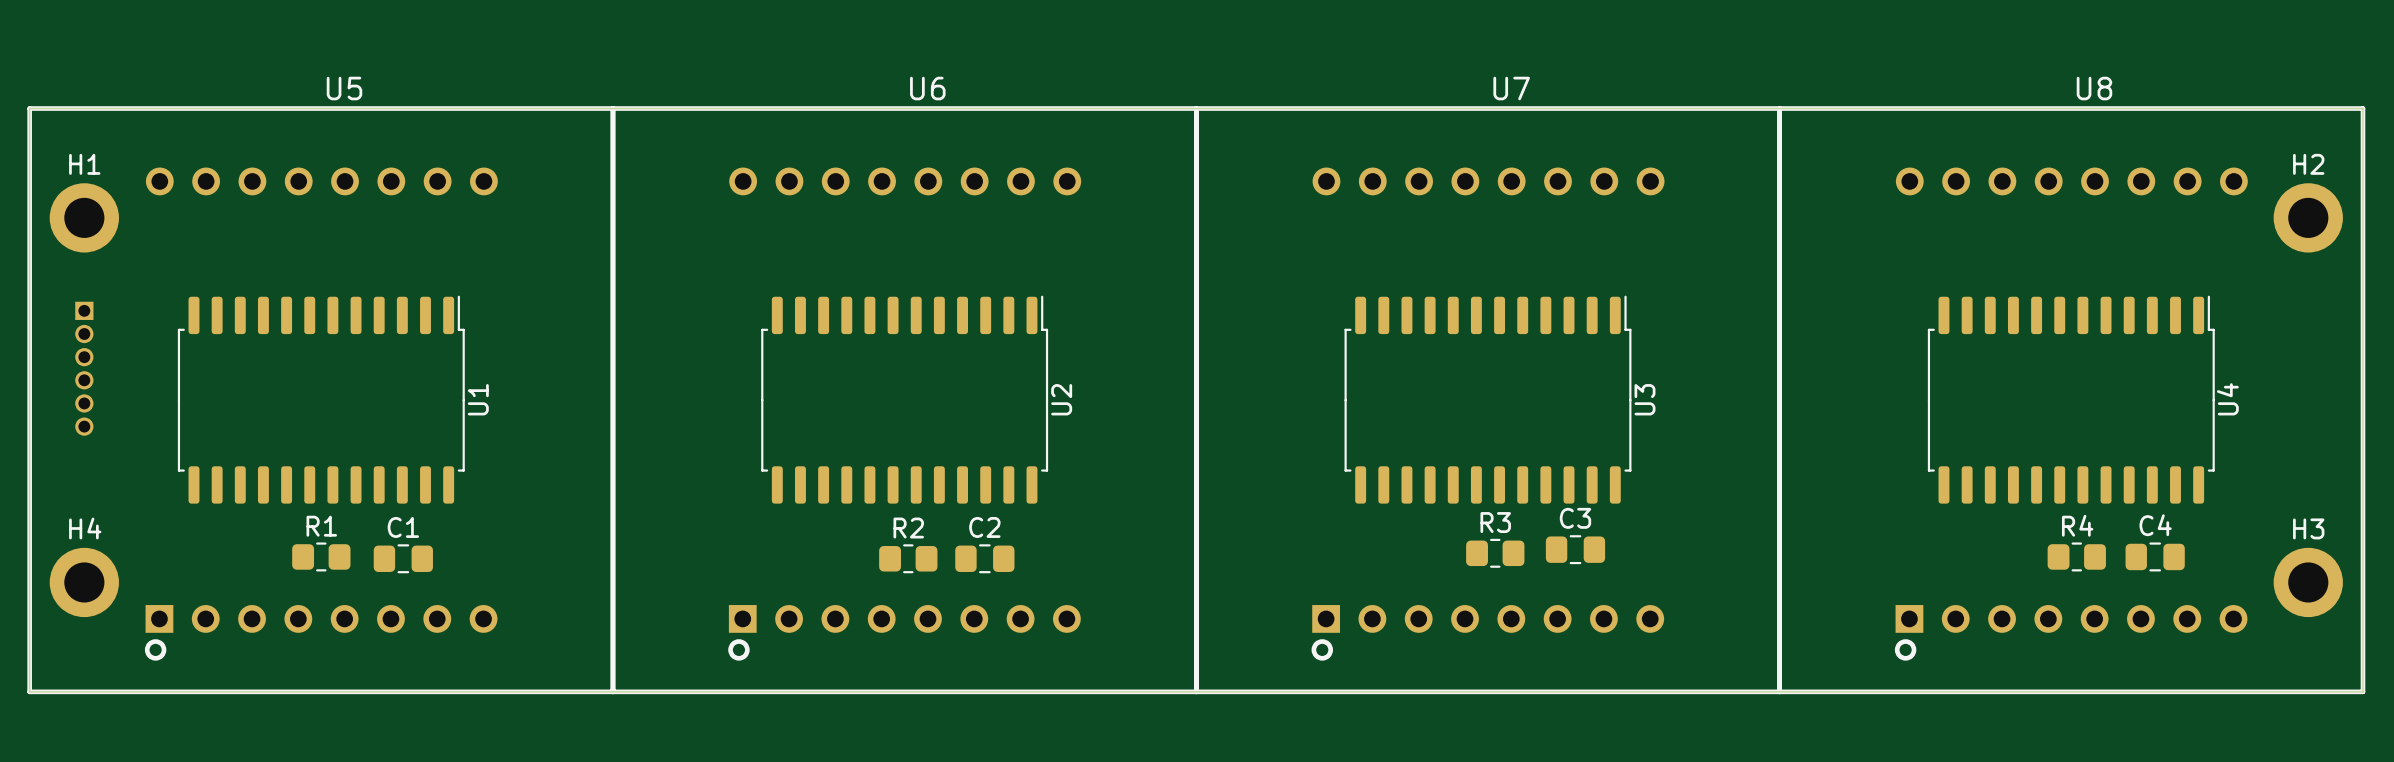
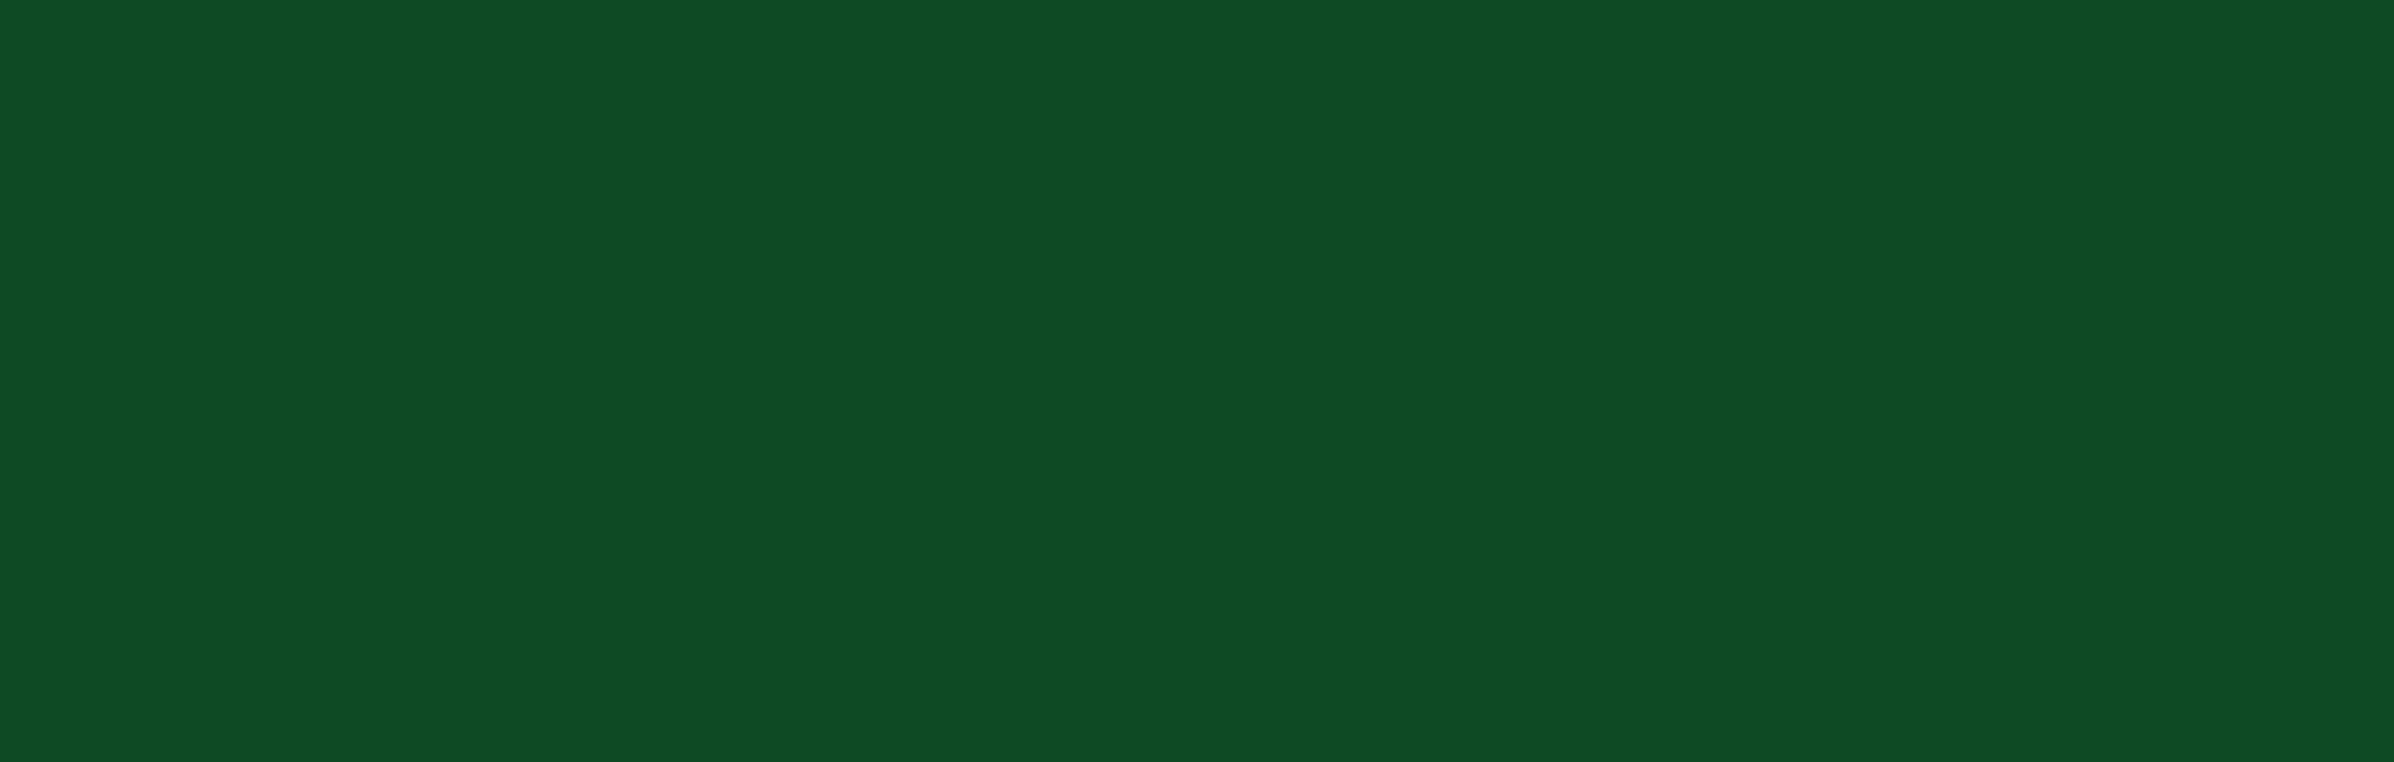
board edge: (29, 108) (29, 691) (2362, 691) (2362, 108) (29, 108) -> none
H1: (84, 217) -> none
H2: (2308, 217) -> none
part: (84, 368) -> none
U1: (321, 399) -> none
U2: (904, 399) -> none
U3: (1487, 399) -> none
U4: (2071, 399) -> none
U5: (321, 400) -> none
U6: (904, 400) -> none
U7: (1487, 400) -> none
U8: (2071, 400) -> none
C3: (1575, 549) -> none
R3: (1495, 553) -> none
R1: (321, 556) -> none
R4: (2076, 556) -> none
C4: (2155, 556) -> none
C1: (403, 558) -> none
R2: (908, 558) -> none
C2: (984, 558) -> none
H4: (84, 582) -> none
H3: (2308, 582) -> none

